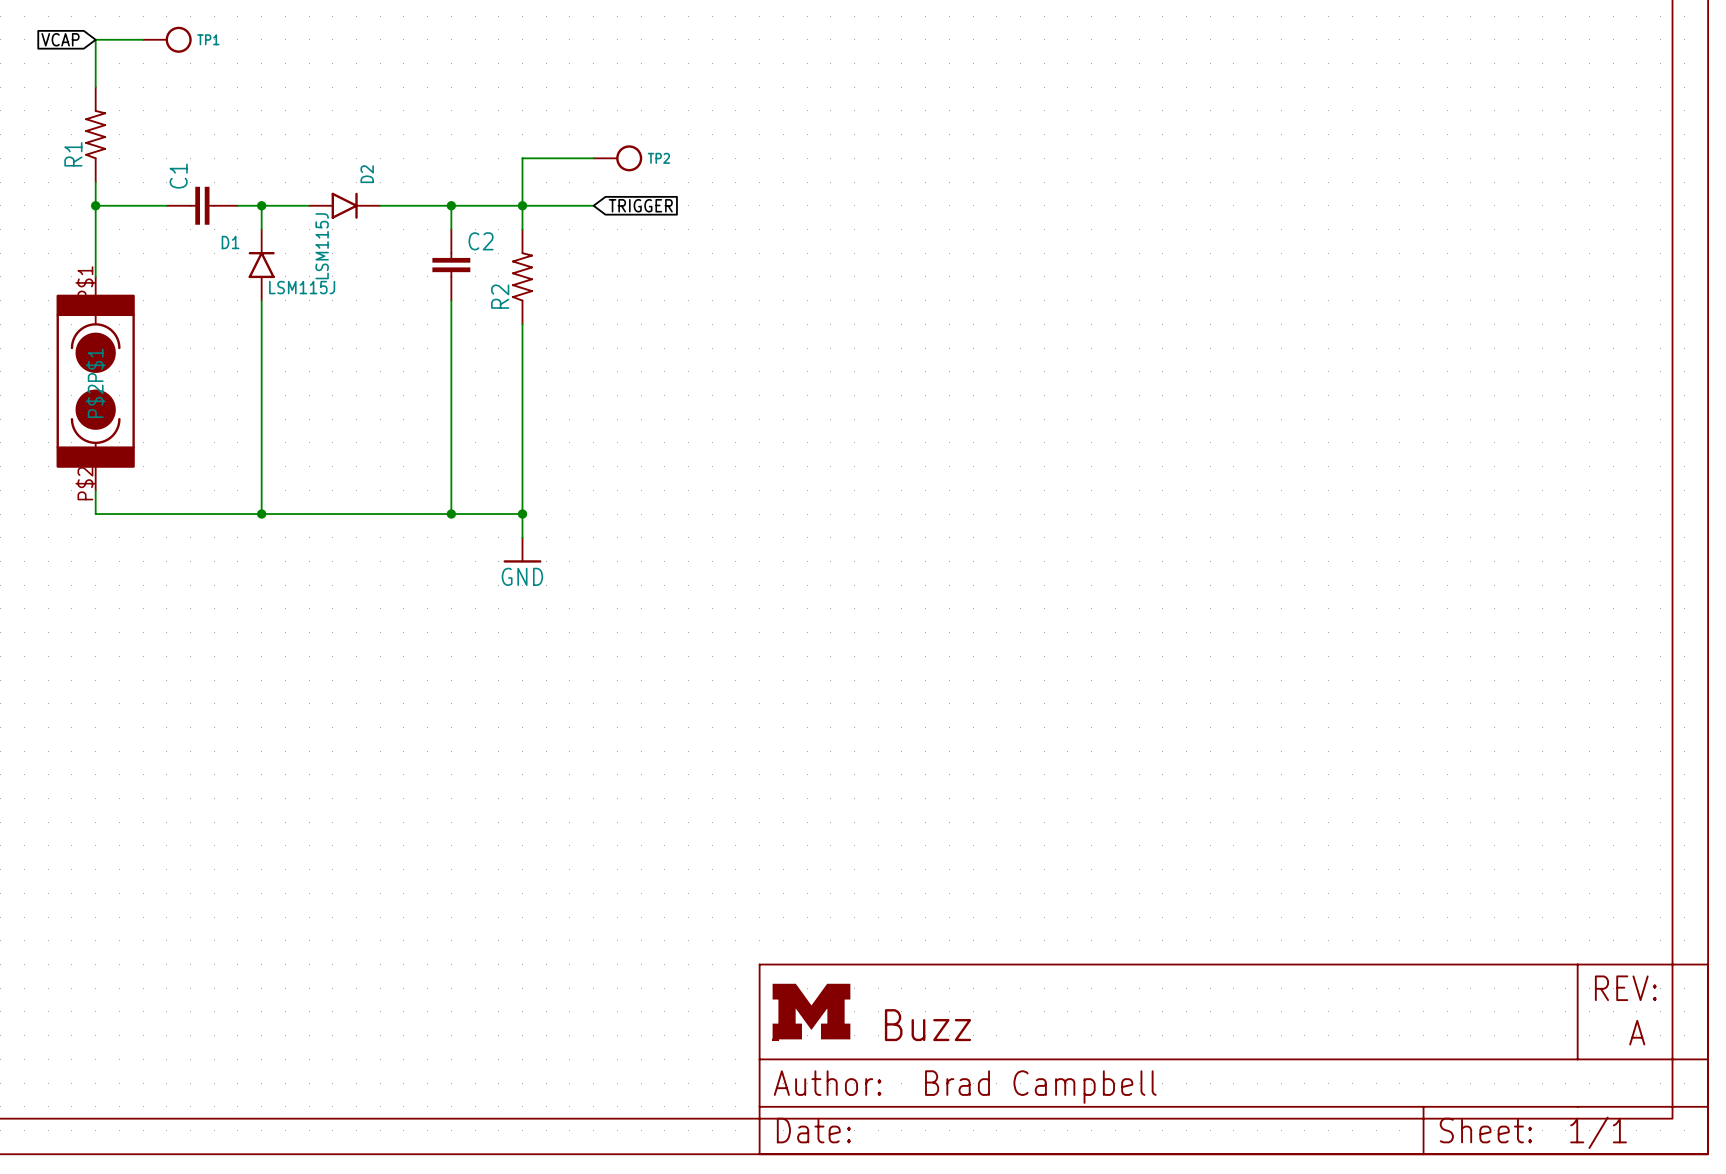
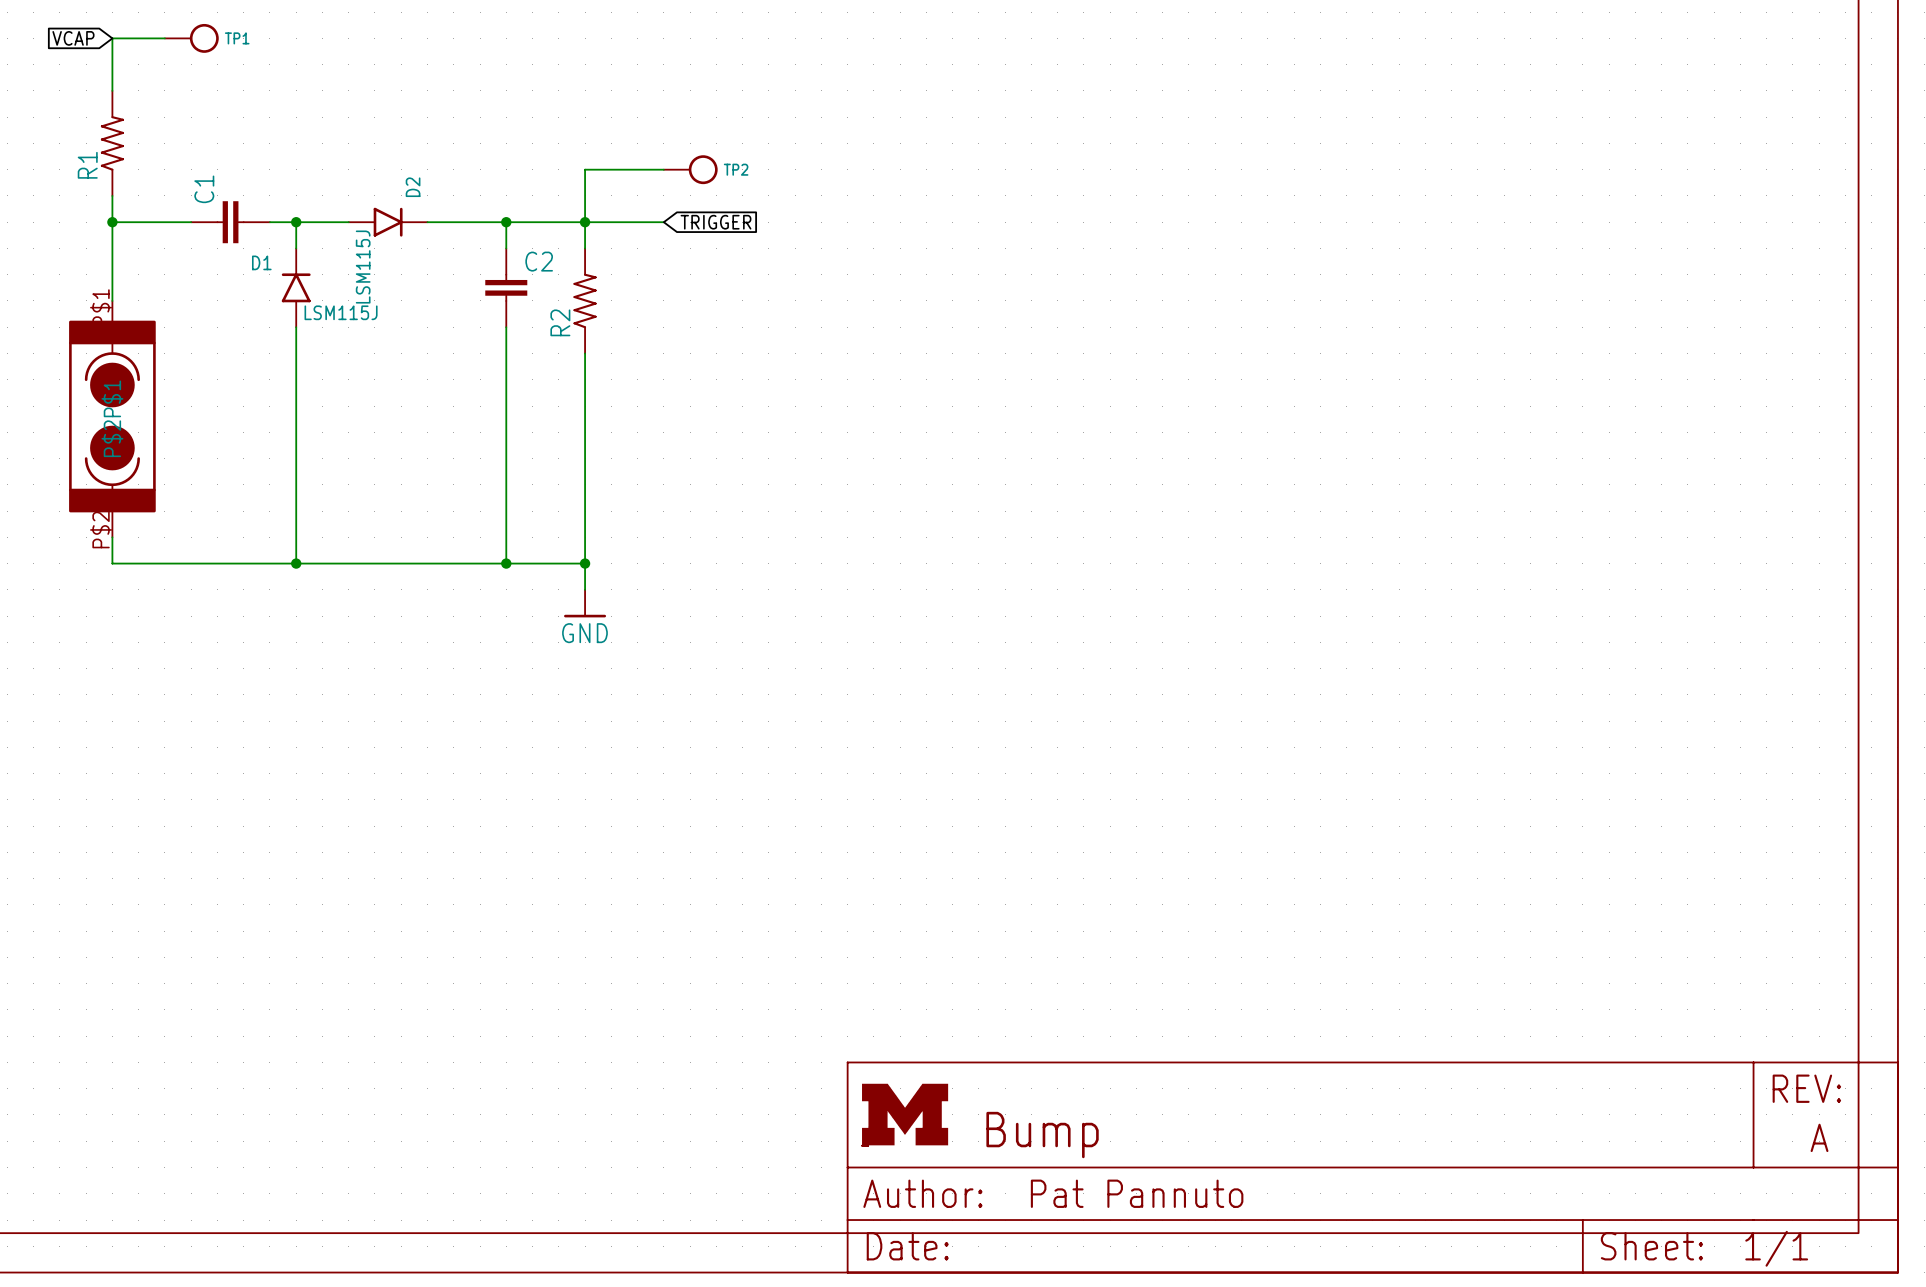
part text: Buzz (928, 1025) -> Bump (1042, 1135)
part text: Brad Campbell (1040, 1087) -> Pat Pannuto (1137, 1193)

